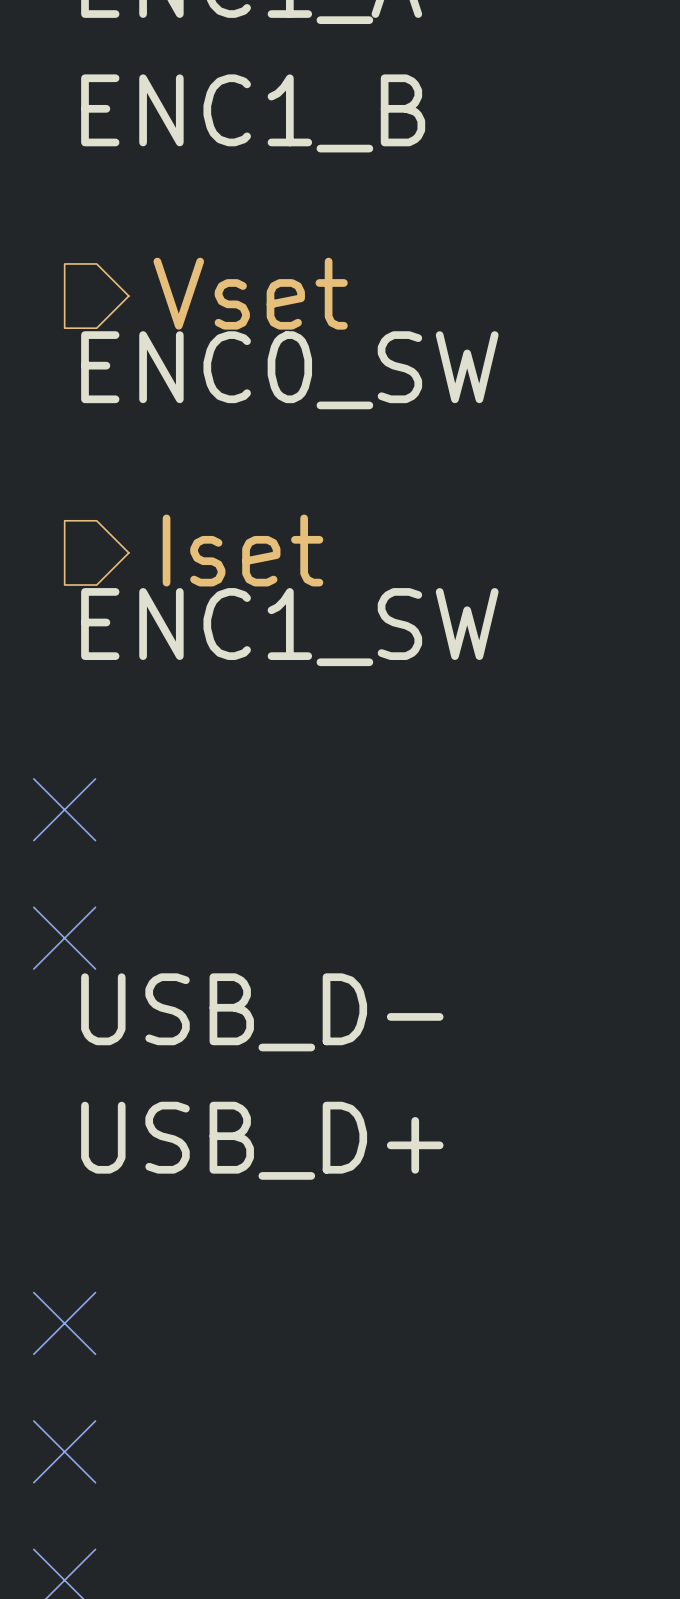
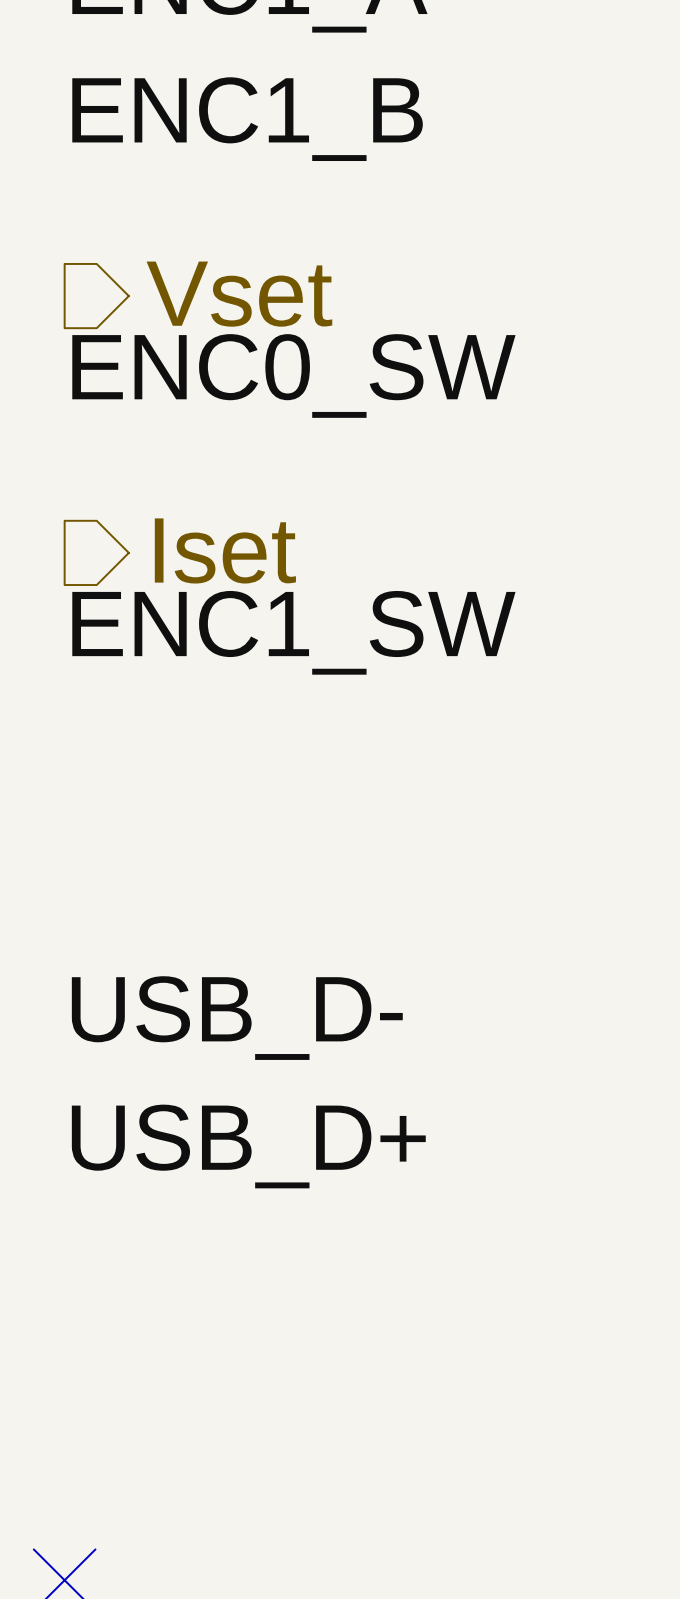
no-connect mark: (64, 809) -> none
no-connect mark: (64, 938) -> none
no-connect mark: (64, 1323) -> none
no-connect mark: (64, 1451) -> none

